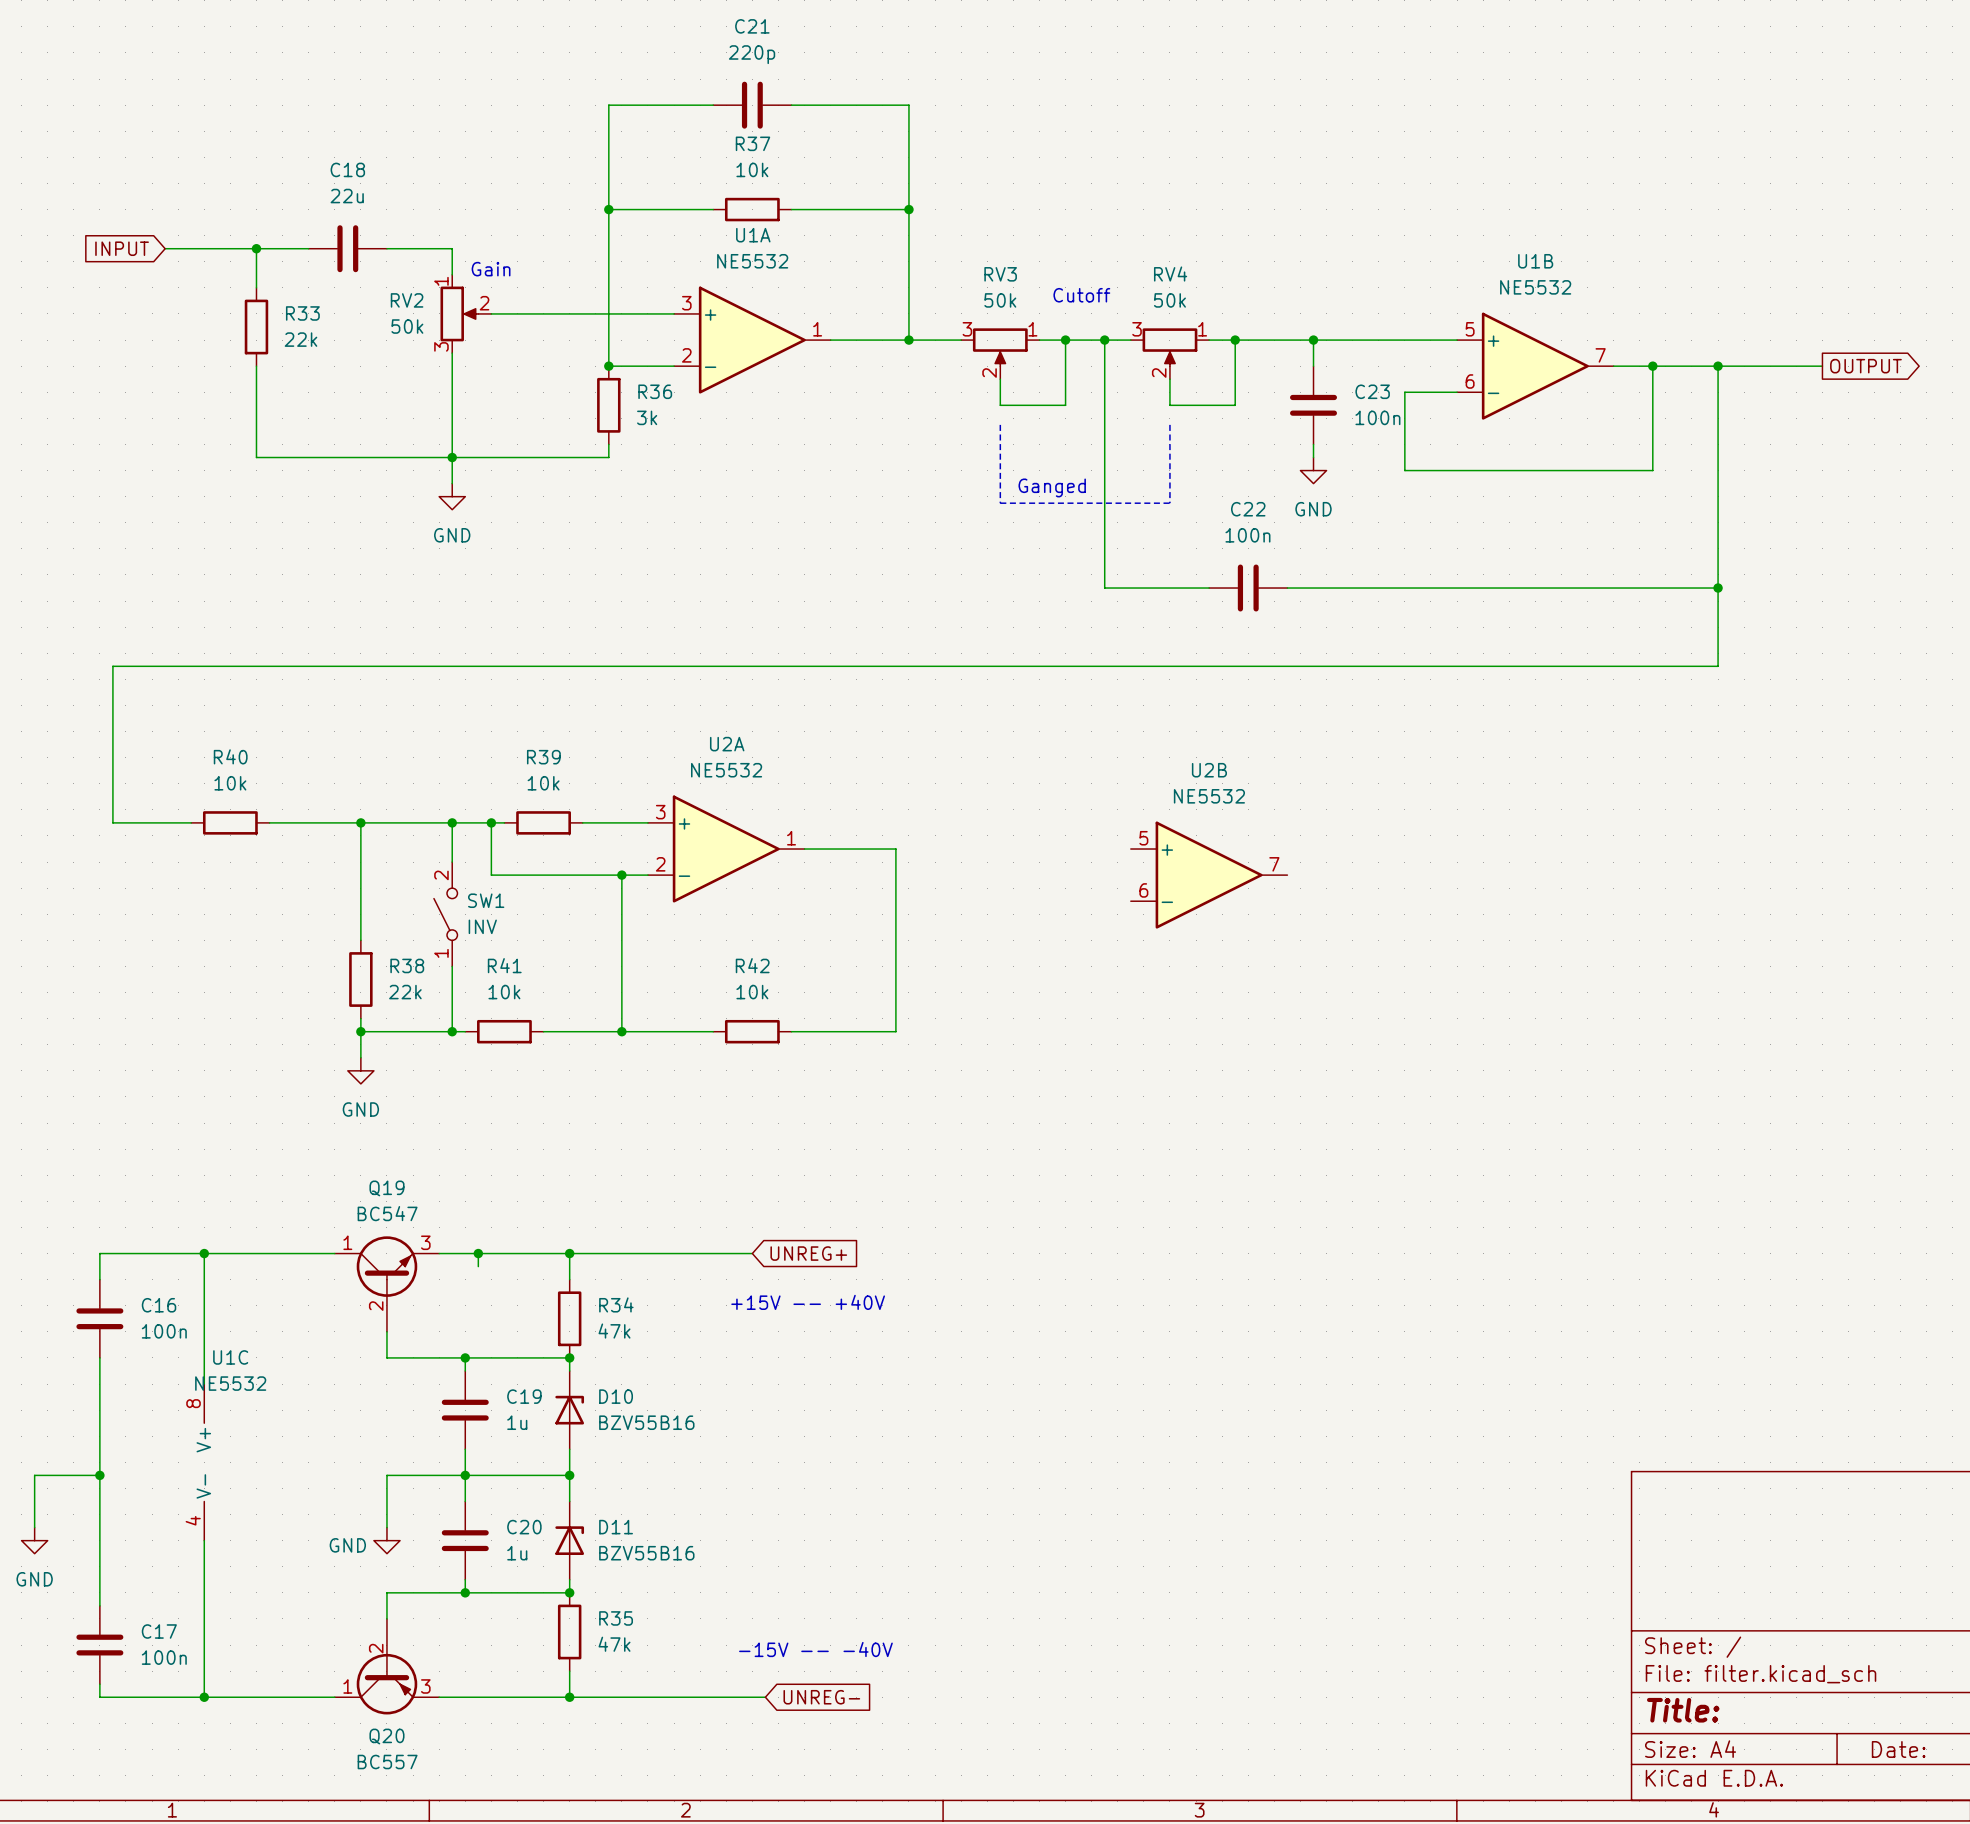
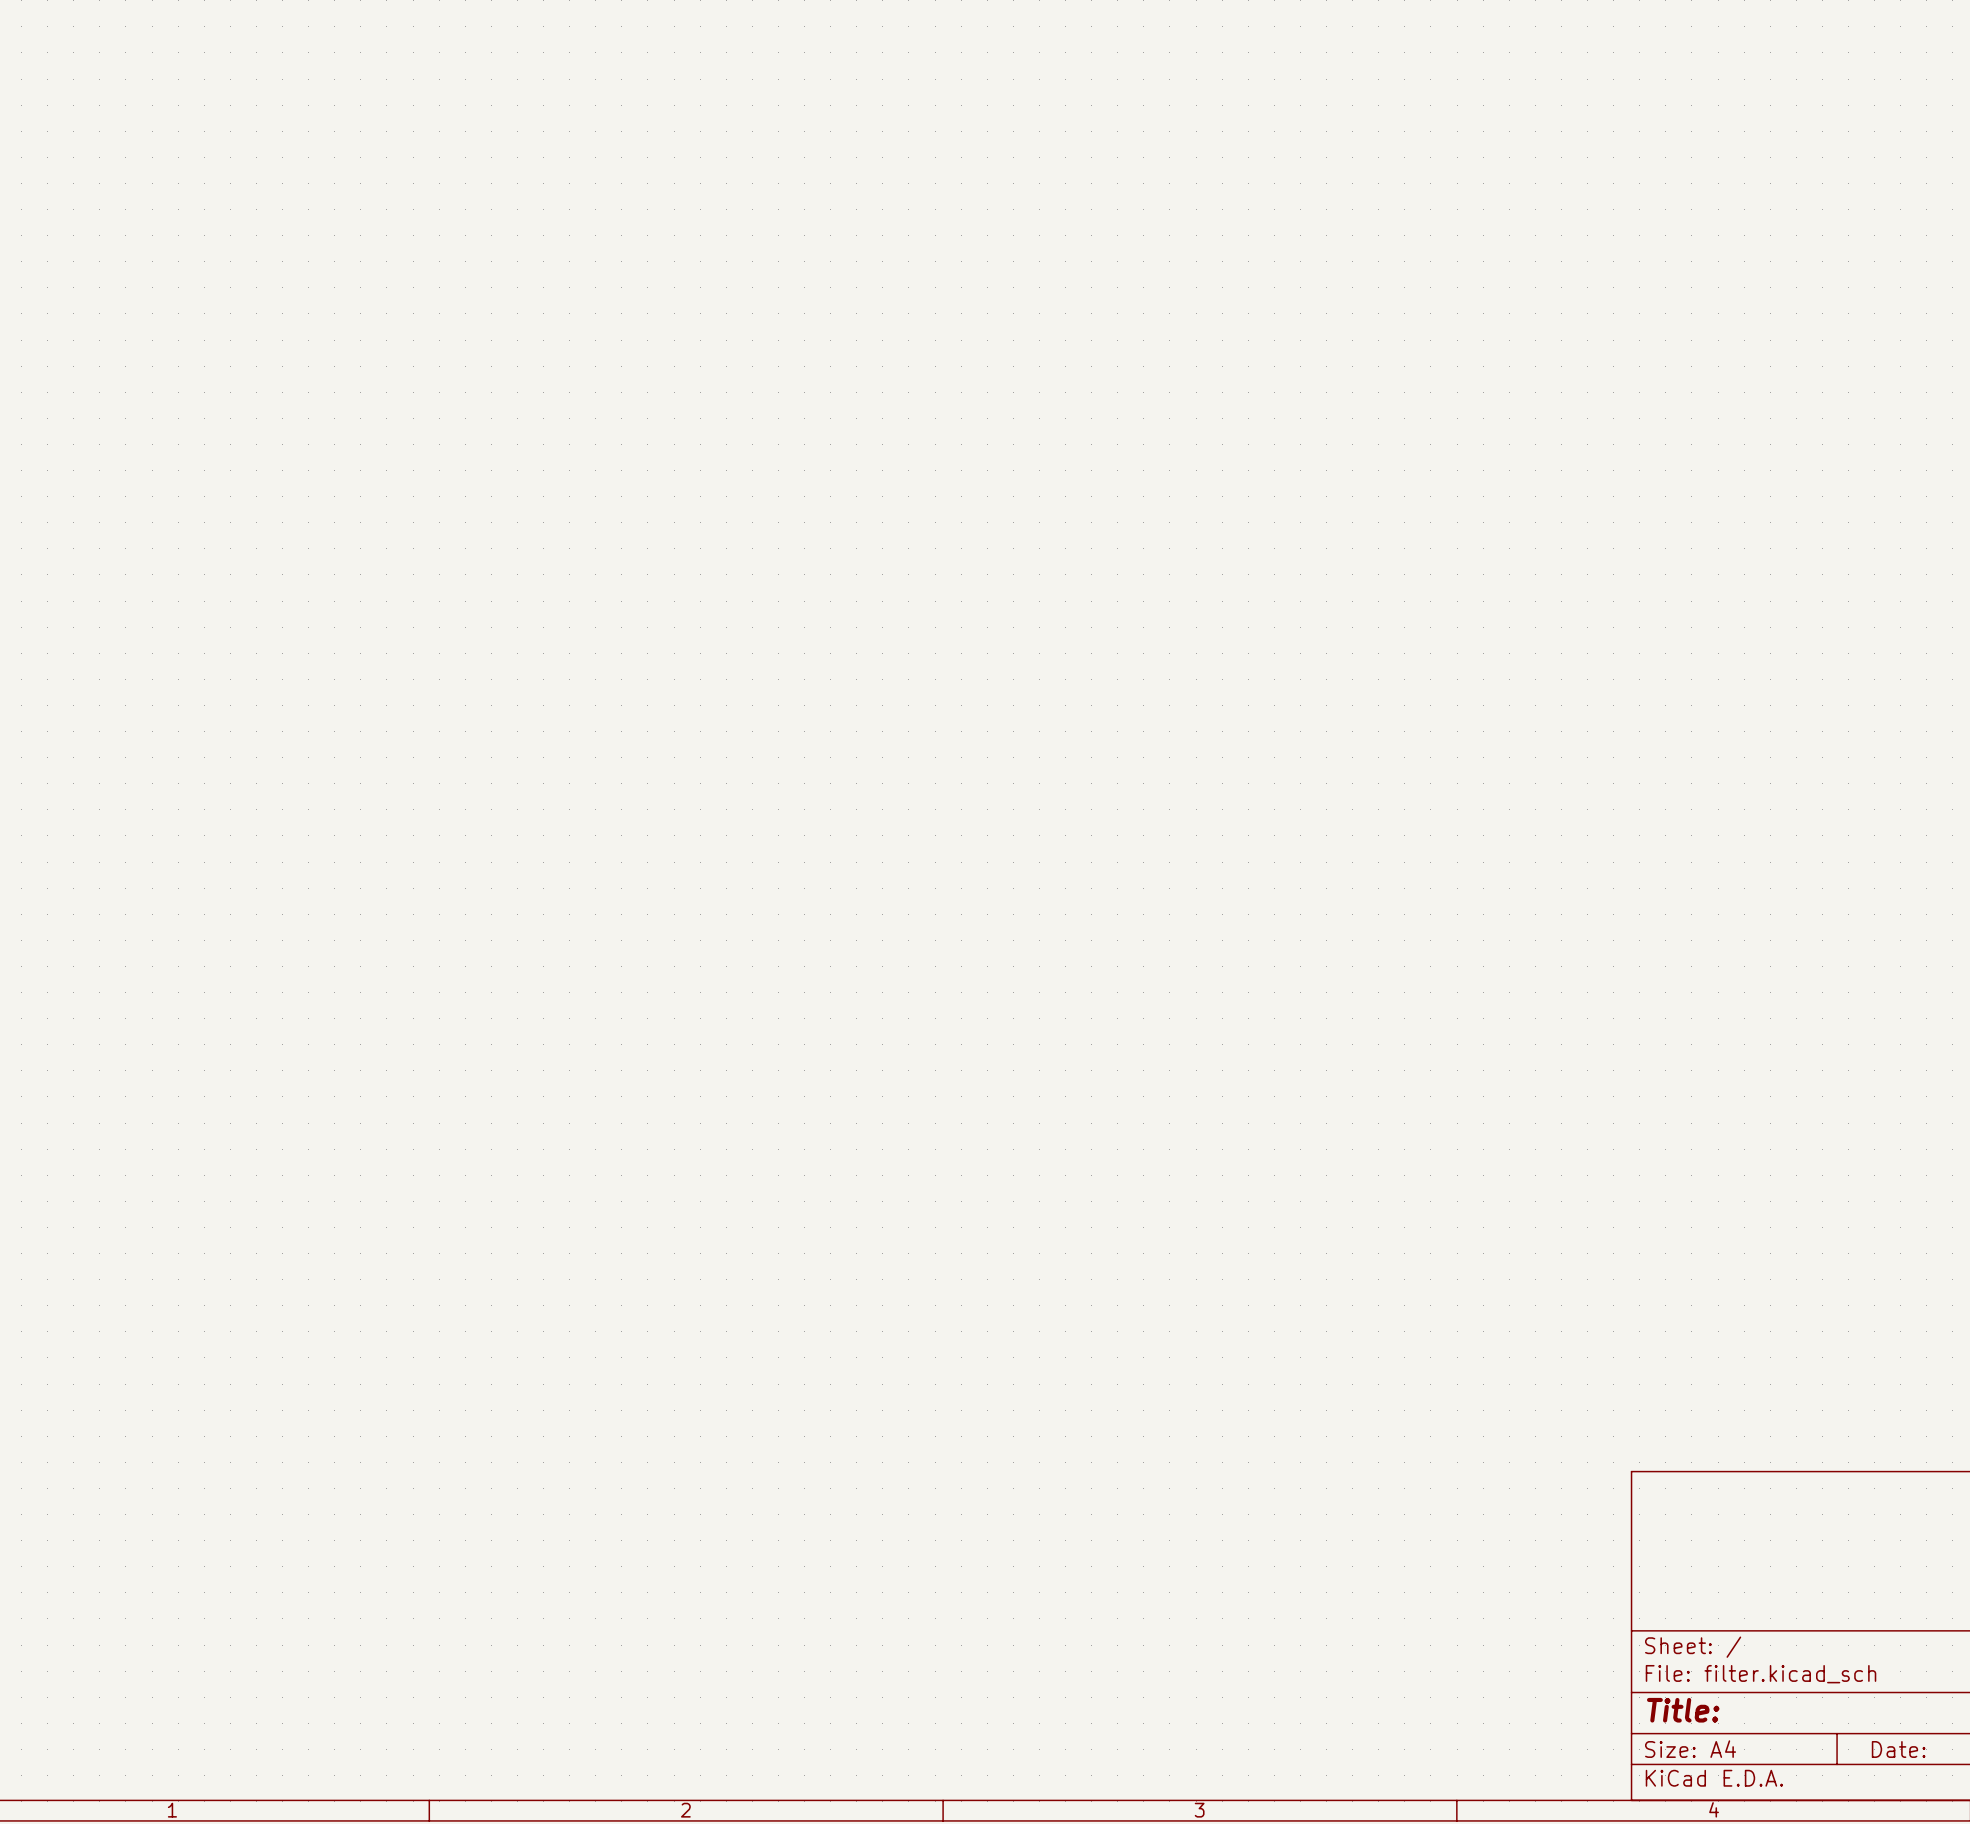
wire: (713, 105) (608, 105) (608, 366) (674, 366) -> none
C21: 220p (752, 105) -> none
wire: (791, 105) (908, 105) (908, 340) -> none
wire: (608, 209) (713, 209) -> none
junction: (608, 209) -> none
R37: 10k (752, 209) -> none
wire: (791, 209) (908, 209) -> none
junction: (908, 209) -> none
global label: INPUT (122, 248) -> none
wire: (165, 248) (308, 248) -> none
wire: (256, 248) (256, 287) -> none
junction: (256, 248) -> none
C18: 22u (347, 248) -> none
wire: (386, 248) (452, 248) (452, 274) -> none
text: Gain (491, 269) -> none
text: Cutoff (1081, 295) -> none
RV2: 50k (465, 313) -> none
wire: (491, 313) (674, 313) -> none
R33: 22k (256, 327) -> none
U1A: NE5532 (752, 340) -> none
wire: (830, 340) (961, 340) -> none
junction: (908, 340) -> none
wire: (1039, 340) (1130, 340) -> none
wire: (1065, 340) (1065, 405) (1000, 405) (1000, 379) -> none
junction: (1065, 340) -> none
wire: (1104, 340) (1104, 588) (1209, 588) -> none
junction: (1104, 340) -> none
wire: (1209, 340) (1457, 340) -> none
wire: (1235, 340) (1235, 405) (1169, 405) (1169, 379) -> none
junction: (1235, 340) -> none
wire: (1313, 340) (1313, 366) -> none
junction: (1313, 340) -> none
wire: (452, 353) (452, 483) -> none
RV3: 50k (1000, 353) -> none
RV4: 50k (1169, 353) -> none
wire: (256, 366) (256, 457) (608, 457) (608, 444) -> none
junction: (608, 366) -> none
U1B: NE5532 (1535, 366) -> none
wire: (1613, 366) (1822, 366) -> none
wire: (1652, 366) (1652, 470) (1404, 470) (1404, 392) (1457, 392) -> none
junction: (1652, 366) -> none
wire: (1718, 366) (1718, 666) (112, 666) (112, 822) (191, 822) -> none
junction: (1718, 366) -> none
global label: OUTPUT (1865, 366) -> none
R36: 3k (608, 405) -> none
C23: 100n (1313, 405) -> none
line: (1000, 424) (1000, 503) (1169, 503) (1169, 424) -> none
wire: (1313, 444) (1313, 457) -> none
junction: (452, 457) -> none
power symbol: GND (1313, 470) -> none
text: Ganged (1052, 487) -> none
power symbol: GND (452, 496) -> none
C22: 100n (1248, 588) -> none
wire: (1287, 588) (1718, 588) -> none
junction: (1718, 588) -> none
R40: 10k (230, 822) -> none
wire: (269, 822) (504, 822) -> none
wire: (360, 822) (360, 940) -> none
junction: (360, 822) -> none
wire: (452, 822) (452, 862) -> none
junction: (452, 822) -> none
wire: (491, 822) (491, 875) (647, 875) -> none
junction: (491, 822) -> none
R39: 10k (543, 822) -> none
wire: (582, 822) (647, 822) -> none
U2A: NE5532 (726, 849) -> none
wire: (804, 849) (895, 849) (895, 1031) (791, 1031) -> none
wire: (621, 875) (621, 1031) -> none
junction: (621, 875) -> none
U2B: NE5532 (1209, 875) -> none
SW1: INV (445, 914) -> none
wire: (452, 966) (452, 1031) -> none
R38: 22k (360, 979) -> none
wire: (360, 1018) (360, 1057) -> none
wire: (360, 1031) (465, 1031) -> none
junction: (360, 1031) -> none
junction: (452, 1031) -> none
R41: 10k (504, 1031) -> none
wire: (543, 1031) (713, 1031) -> none
junction: (621, 1031) -> none
R42: 10k (752, 1031) -> none
power symbol: GND (360, 1070) -> none
wire: (204, 1253) (204, 1384) -> none
junction: (204, 1253) -> none
wire: (334, 1253) (99, 1253) (99, 1279) -> none
wire: (439, 1253) (752, 1253) -> none
wire: (478, 1253) (478, 1266) -> none
junction: (478, 1253) -> none
wire: (569, 1253) (569, 1279) -> none
junction: (569, 1253) -> none
global label: UNREG+ (808, 1253) -> none
Q19: BC547 (386, 1284) -> none
text: +15V -- +40V (808, 1302) -> none
C16: 100n (99, 1318) -> none
R34: 47k (569, 1318) -> none
wire: (386, 1331) (386, 1357) (569, 1357) (569, 1371) -> none
wire: (99, 1357) (99, 1605) -> none
wire: (465, 1357) (465, 1371) -> none
junction: (465, 1357) -> none
junction: (569, 1357) -> none
C19: 1u (465, 1410) -> none
D10: BZV55B16 (569, 1410) -> none
wire: (465, 1449) (465, 1501) -> none
wire: (569, 1449) (569, 1501) -> none
U1C: NE5532 (204, 1462) -> none
wire: (99, 1475) (34, 1475) (34, 1527) -> none
junction: (99, 1475) -> none
junction: (465, 1475) -> none
wire: (569, 1475) (386, 1475) (386, 1527) -> none
junction: (569, 1475) -> none
power symbol: GND (34, 1540) -> none
wire: (204, 1540) (204, 1697) -> none
power symbol: GND (386, 1540) -> none
C20: 1u (465, 1540) -> none
D11: BZV55B16 (569, 1540) -> none
wire: (465, 1579) (465, 1592) -> none
wire: (569, 1579) (569, 1592) (386, 1592) (386, 1618) -> none
junction: (465, 1592) -> none
junction: (569, 1592) -> none
R35: 47k (569, 1631) -> none
C17: 100n (99, 1645) -> none
text: -15V -- -40V (815, 1649) -> none
Q20: BC557 (386, 1666) -> none
wire: (569, 1671) (569, 1697) -> none
wire: (99, 1684) (99, 1697) (334, 1697) -> none
junction: (204, 1697) -> none
wire: (439, 1697) (765, 1697) -> none
junction: (569, 1697) -> none
global label: UNREG- (821, 1697) -> none

